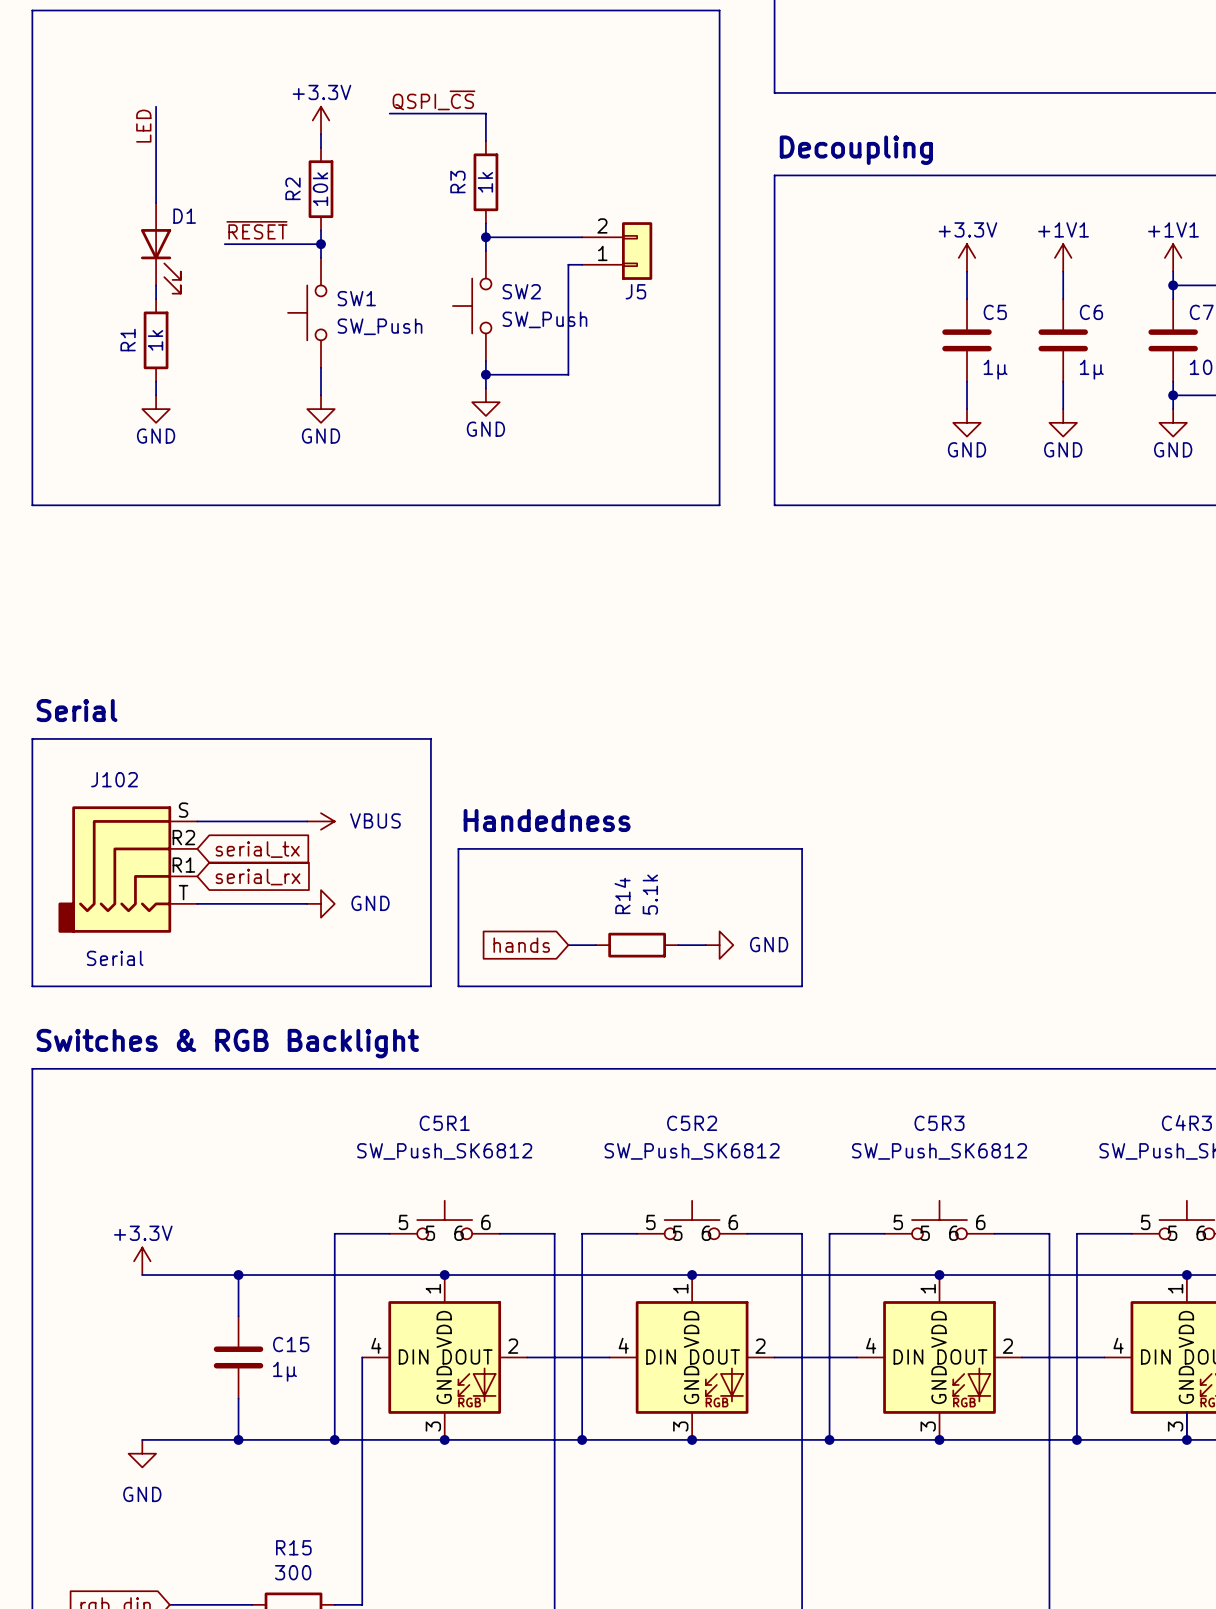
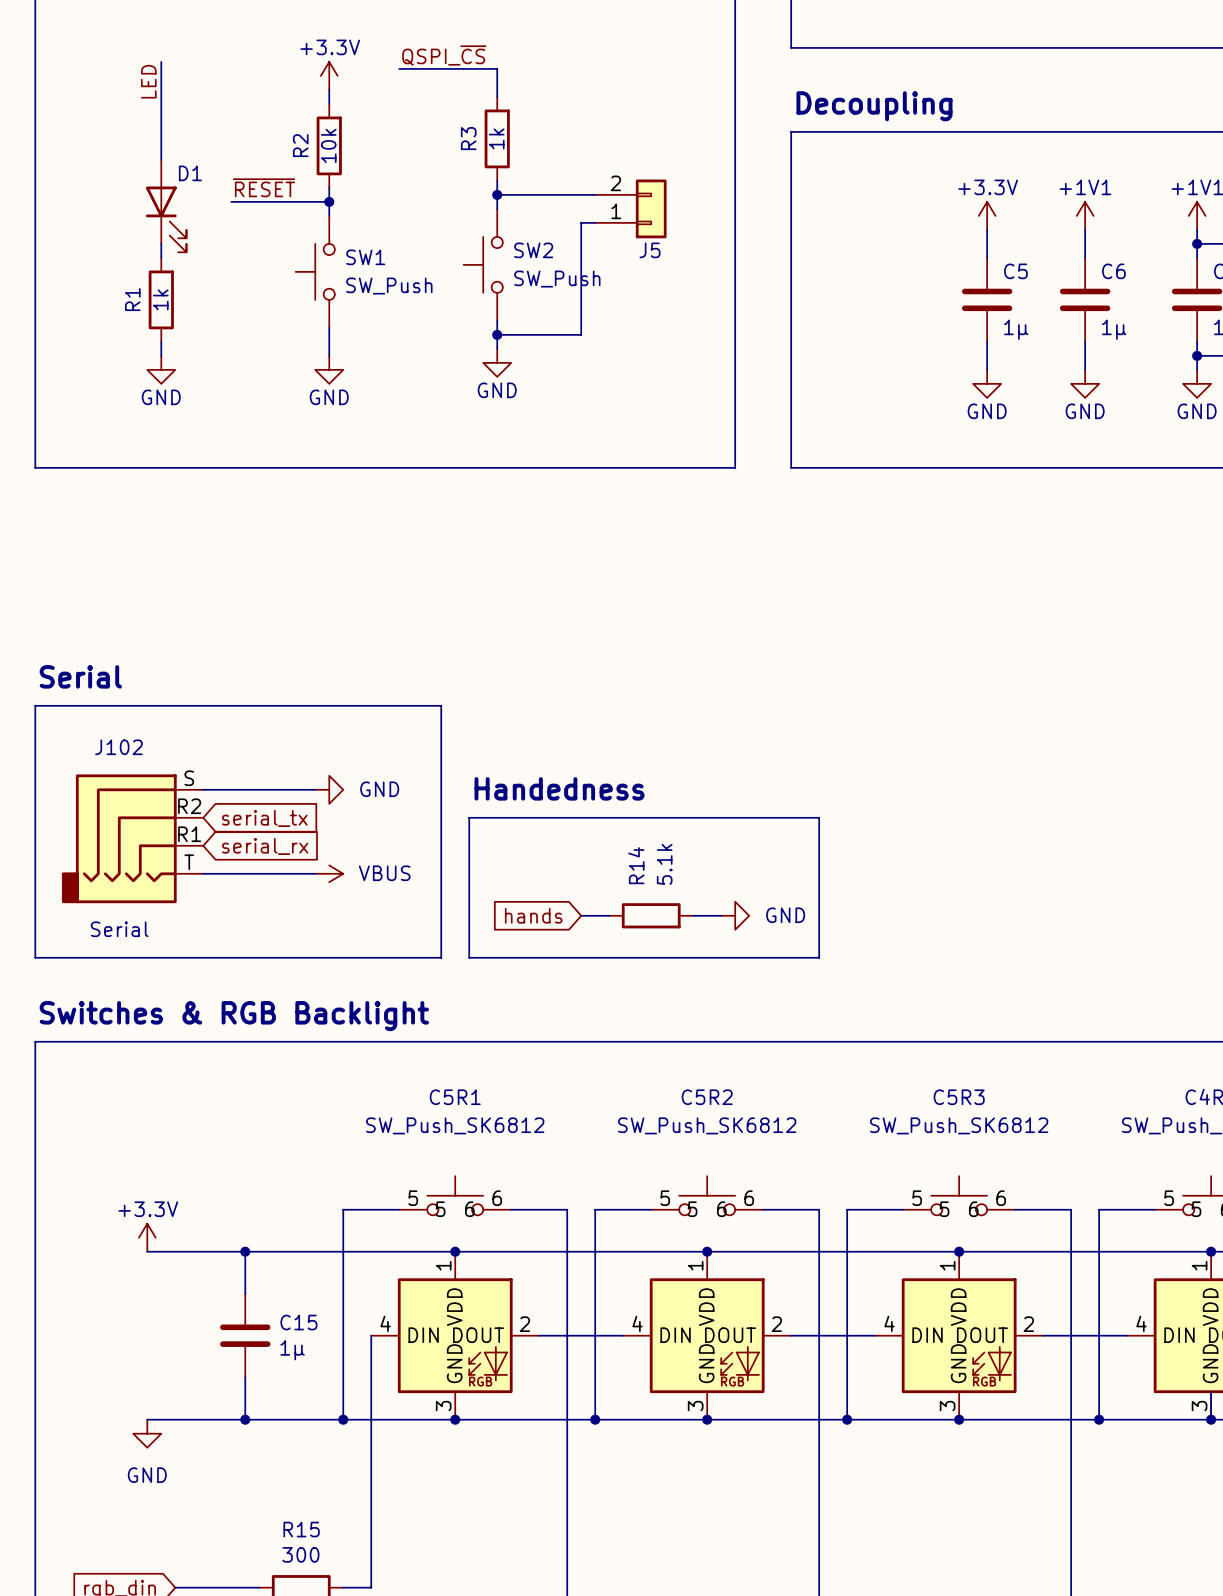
power symbol: VBUS (321, 821) -> GND (329, 789)
power symbol: GND (321, 903) -> VBUS (329, 873)

